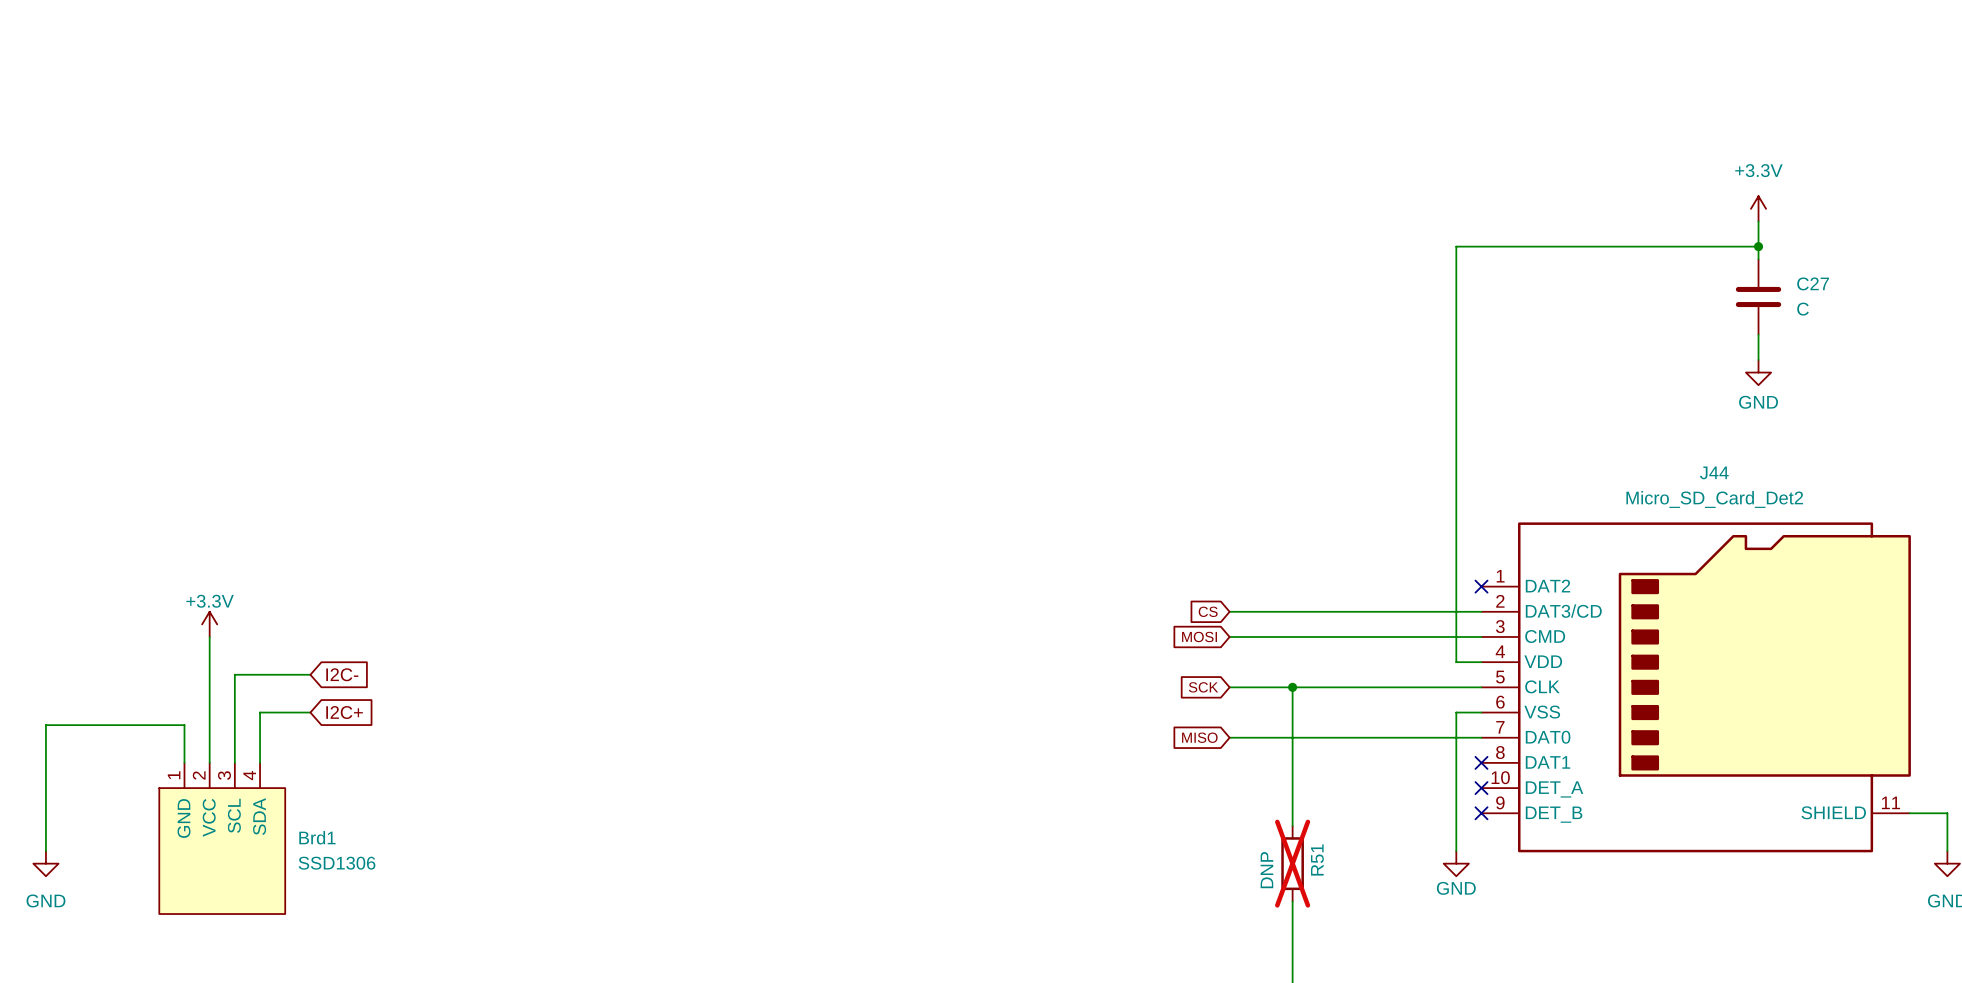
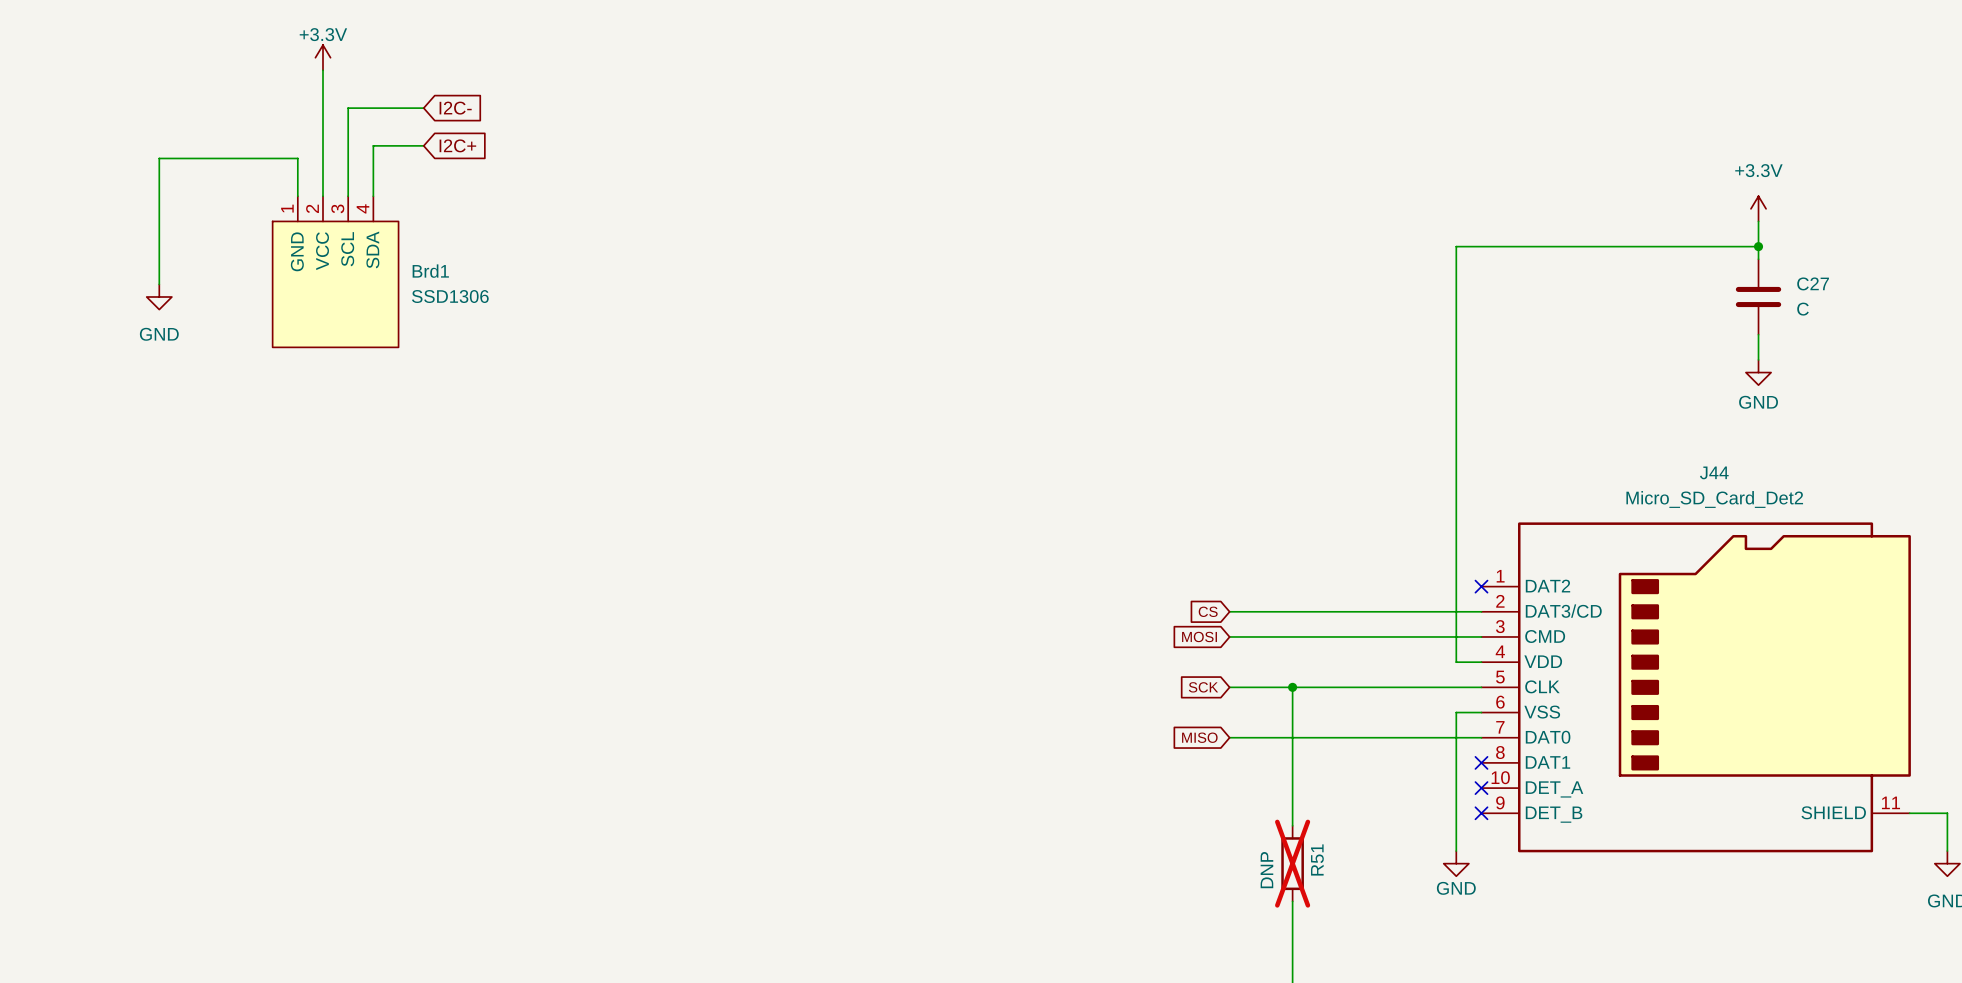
power symbol: none -> +3.3V (323, 57)
wire: none -> (323, 70) (323, 196)
wire: none -> (423, 108) (348, 108) (348, 196)
global label: none -> I2C- (455, 108)
wire: none -> (423, 145) (373, 145) (373, 196)
global label: none -> I2C+ (457, 145)
wire: none -> (297, 196) (297, 158) (159, 158) (159, 284)
power symbol: none -> GND (159, 296)
power symbol: +3.3V (209, 624) -> none
wire: (209, 636) (209, 762) -> none
wire: (310, 674) (234, 674) (234, 762) -> none
global label: I2C- (342, 674) -> none
wire: (310, 712) (260, 712) (260, 762) -> none
global label: I2C+ (344, 712) -> none
wire: (184, 762) (184, 725) (45, 725) (45, 851) -> none
Brd1 position: (222, 838) -> (335, 271)
power symbol: GND (45, 863) -> none

